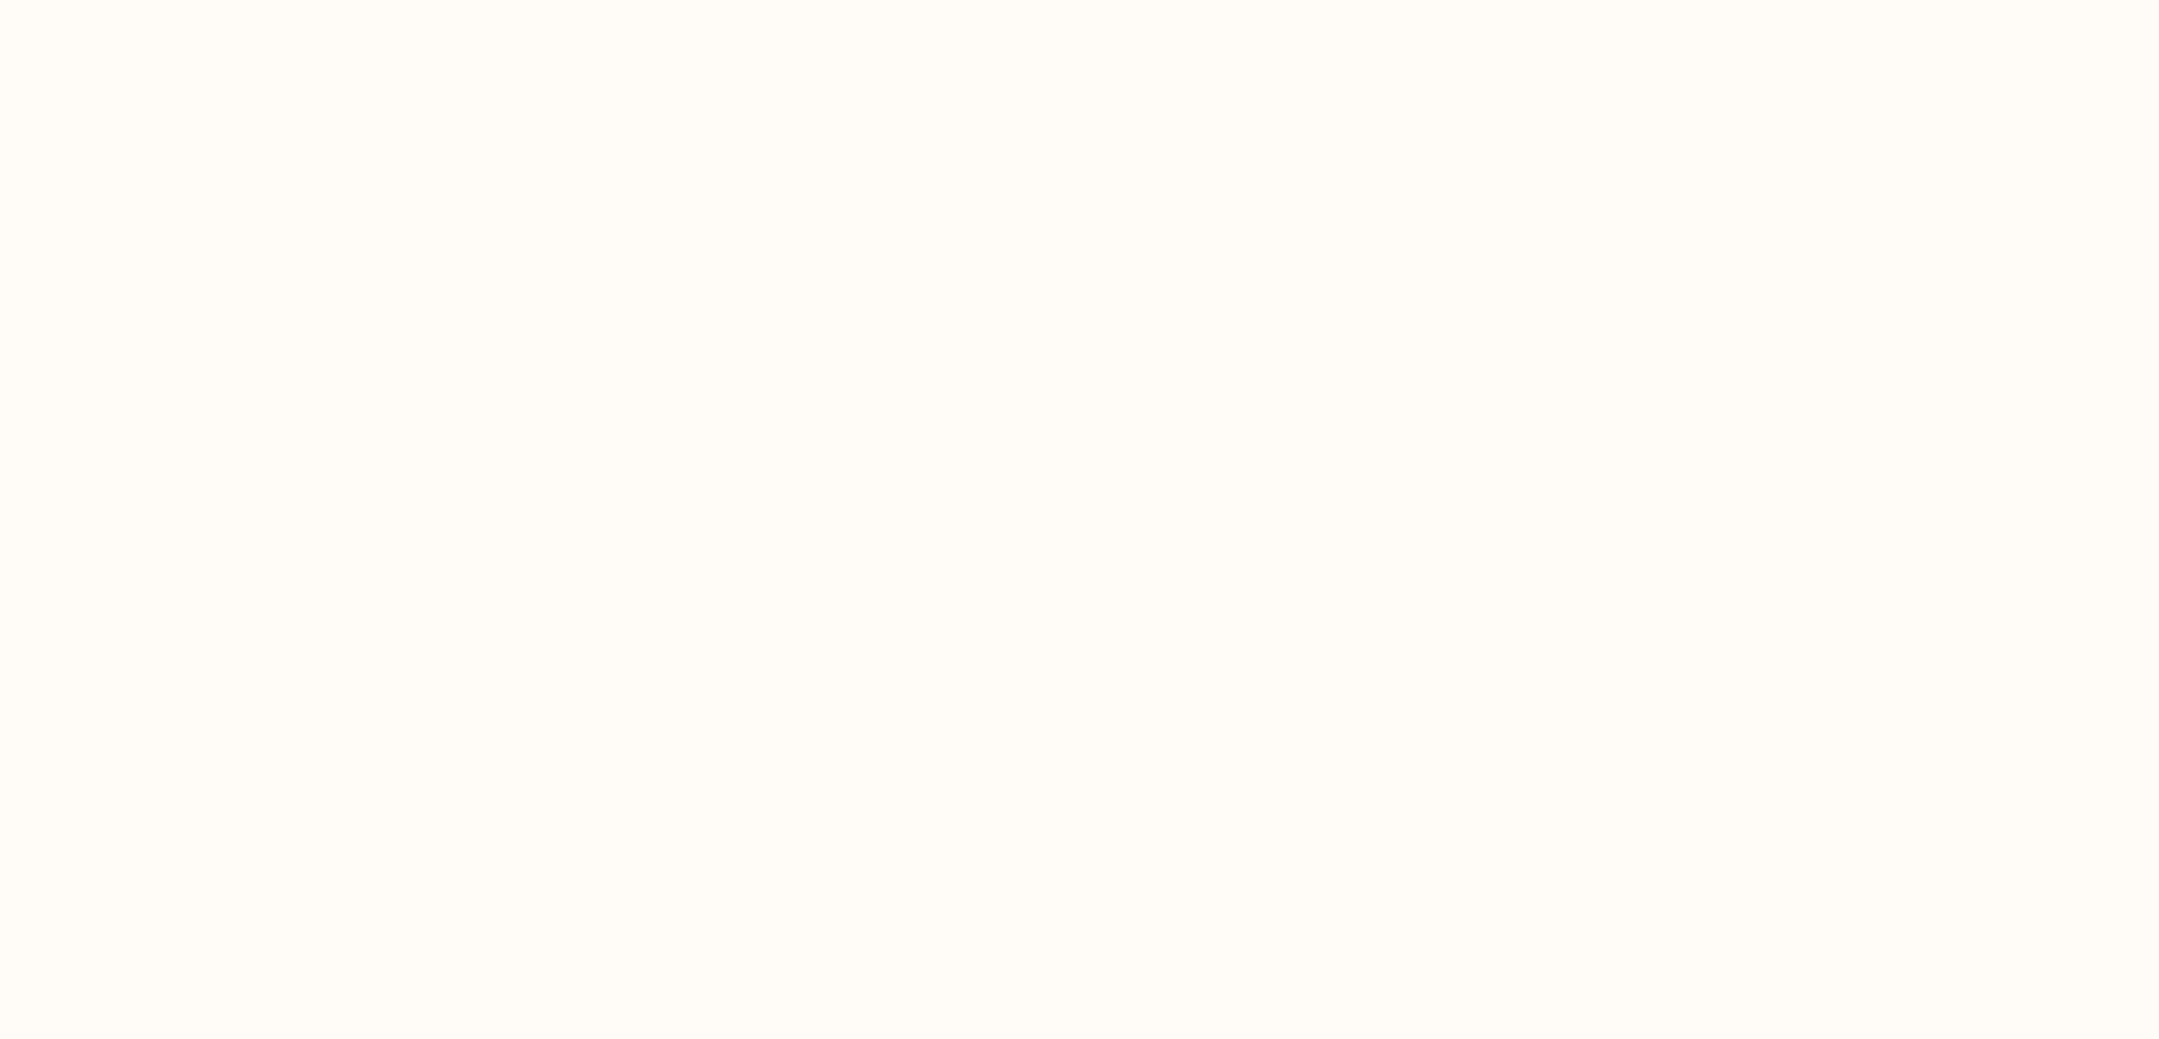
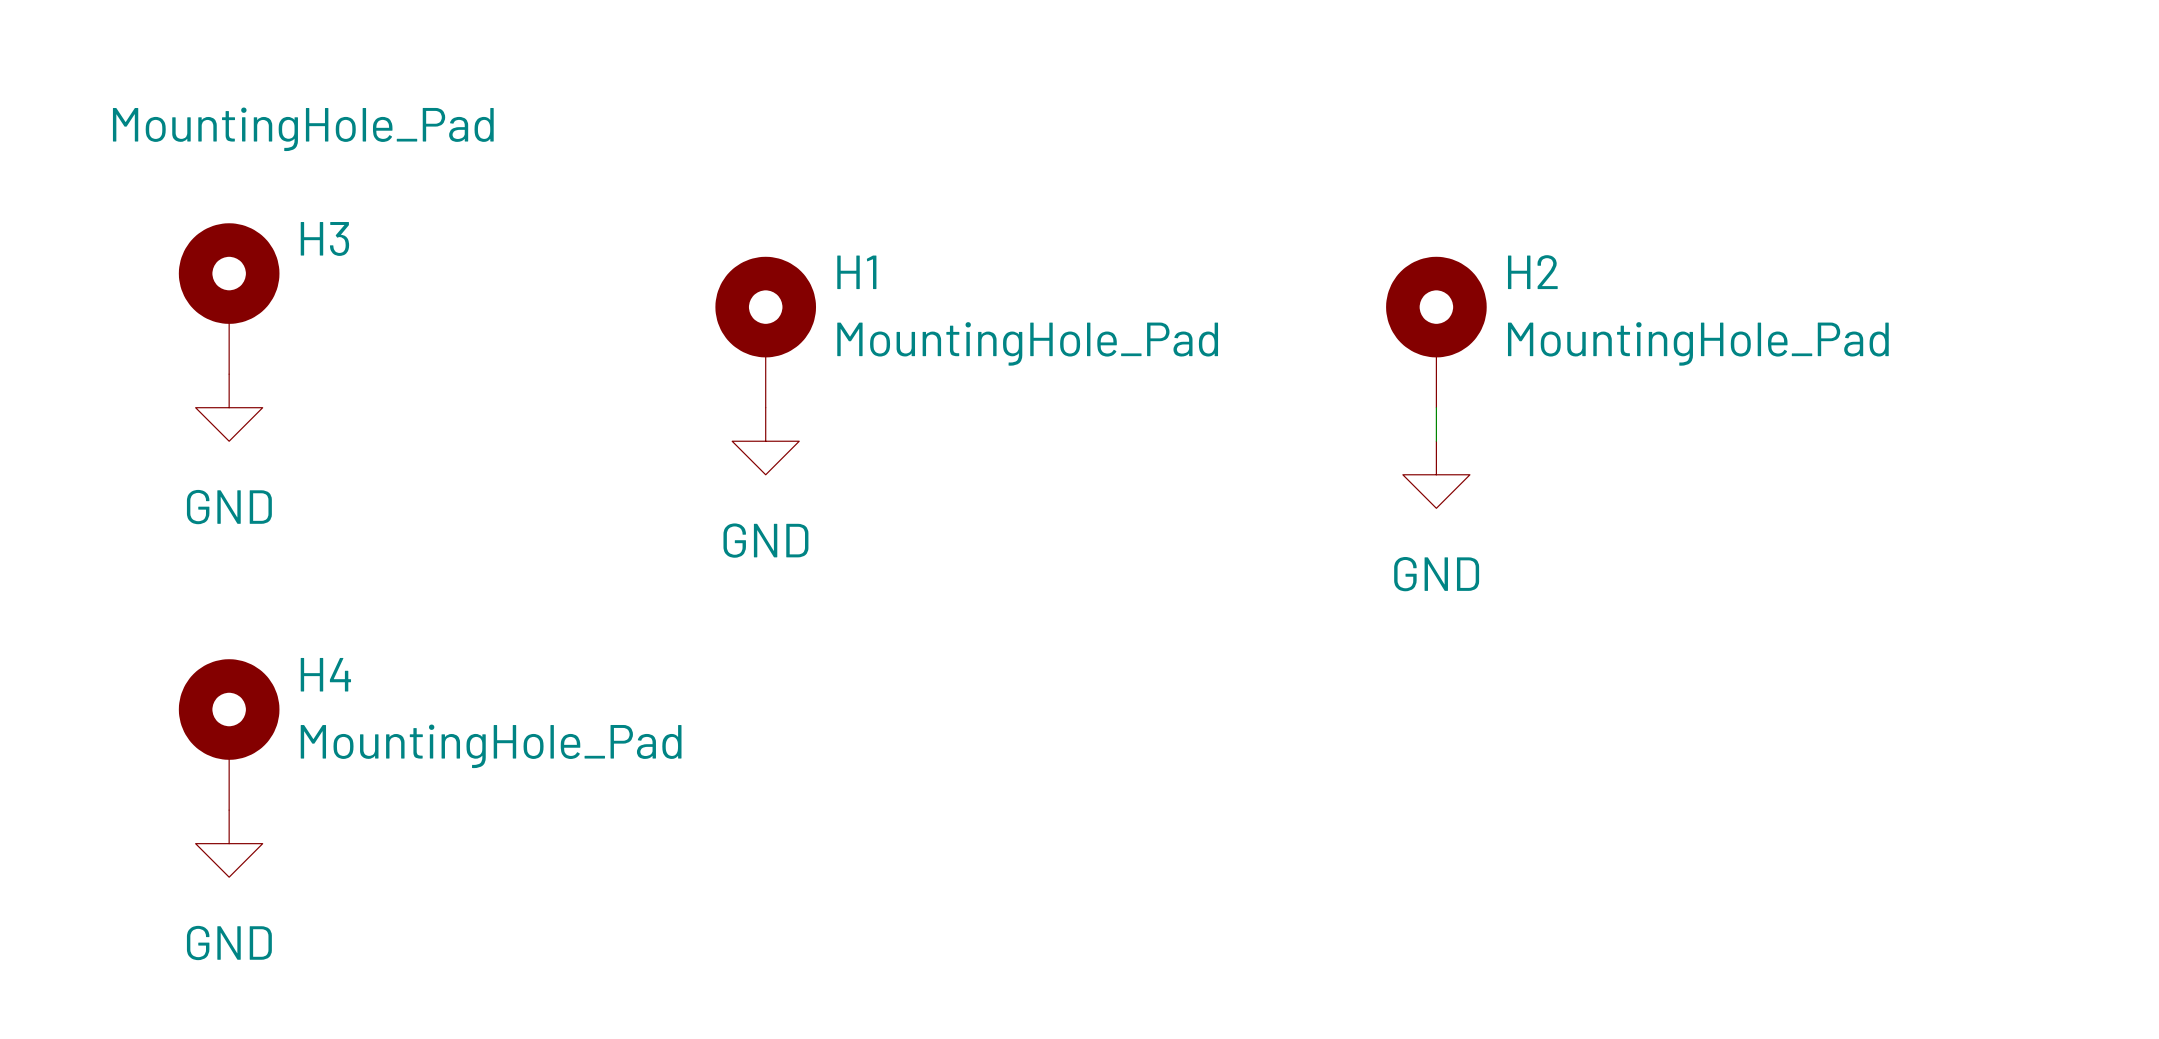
H3: none -> MountingHole_Pad (229, 298)
H1: none -> MountingHole_Pad (765, 332)
H2: none -> MountingHole_Pad (1436, 332)
power symbol: none -> GND (229, 407)
wire: none -> (1436, 407) (1436, 441)
power symbol: none -> GND (765, 441)
power symbol: none -> GND (1436, 474)
H4: none -> MountingHole_Pad (229, 734)
power symbol: none -> GND (229, 843)

